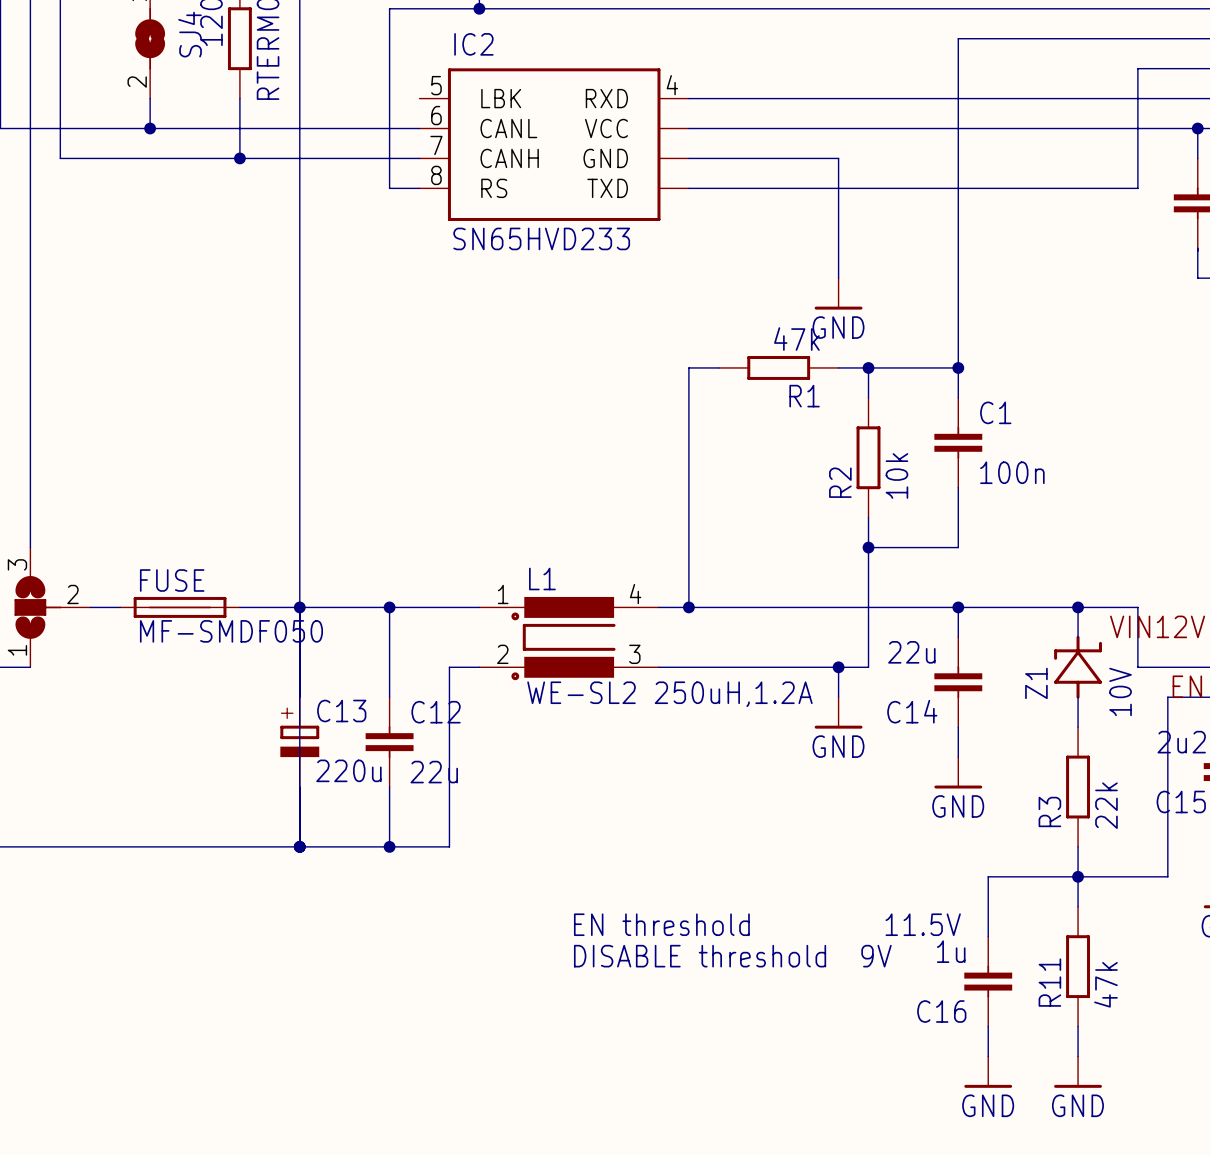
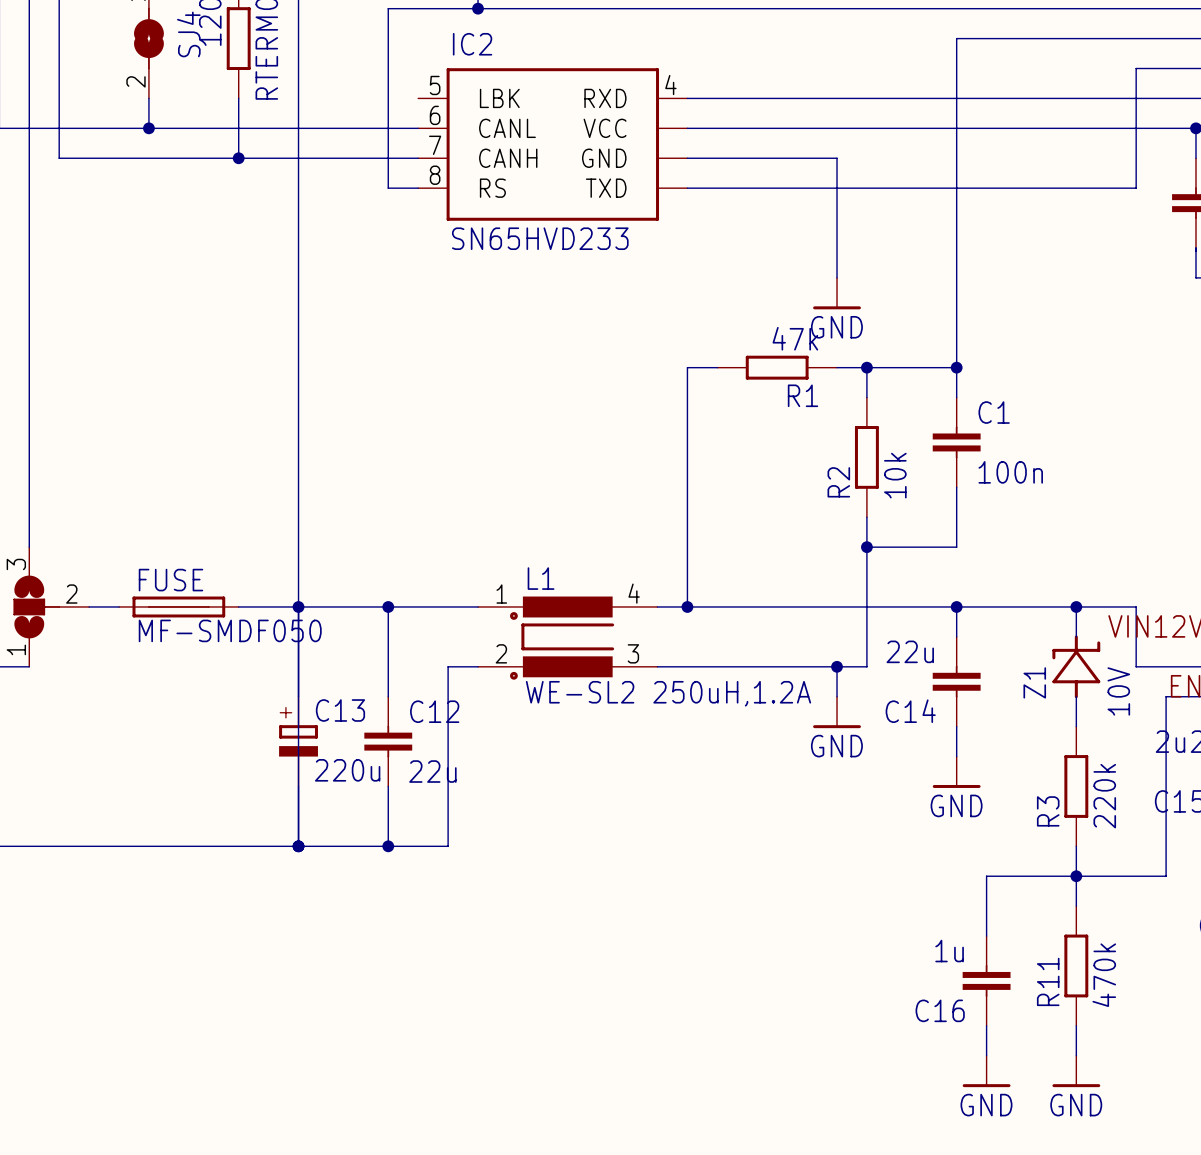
R3 value: 22k (1106, 805) -> 220k (1104, 796)
text: EN threshold 11.5V (767, 924) -> none
text: DISABLE threshold 9V (732, 956) -> none
R11 value: 47k (1105, 984) -> 470k (1104, 975)

